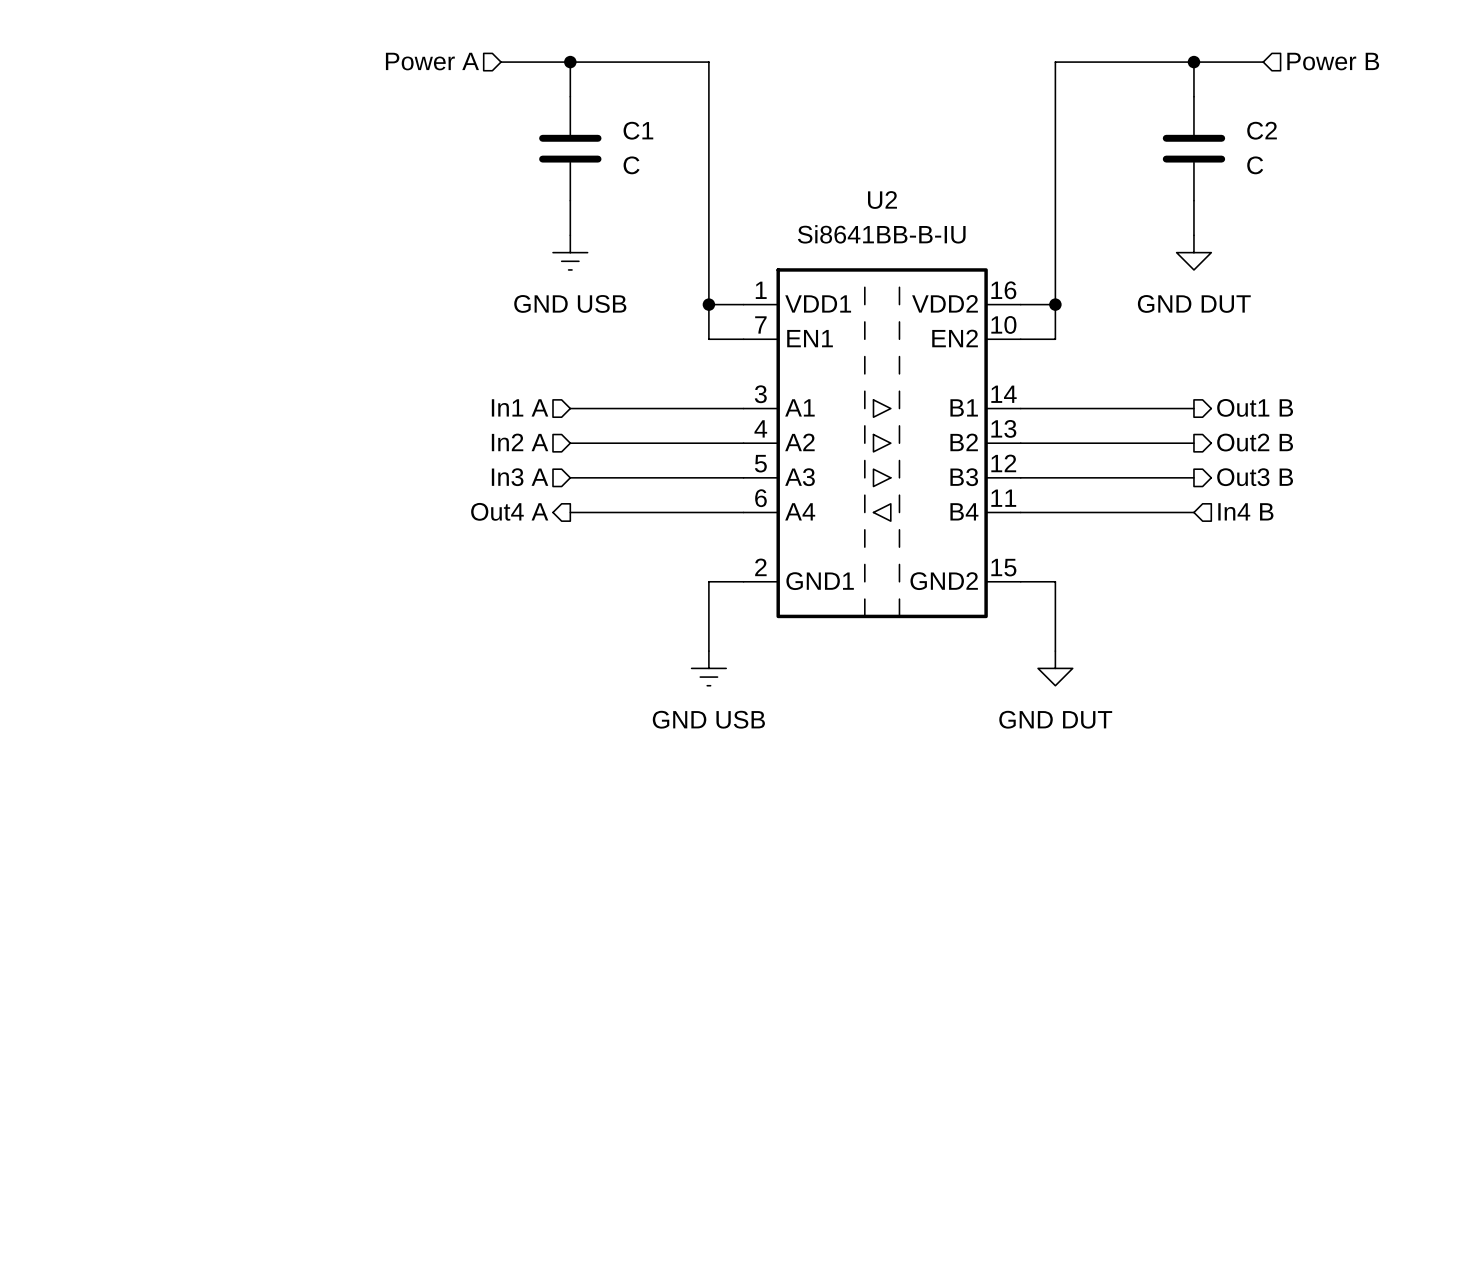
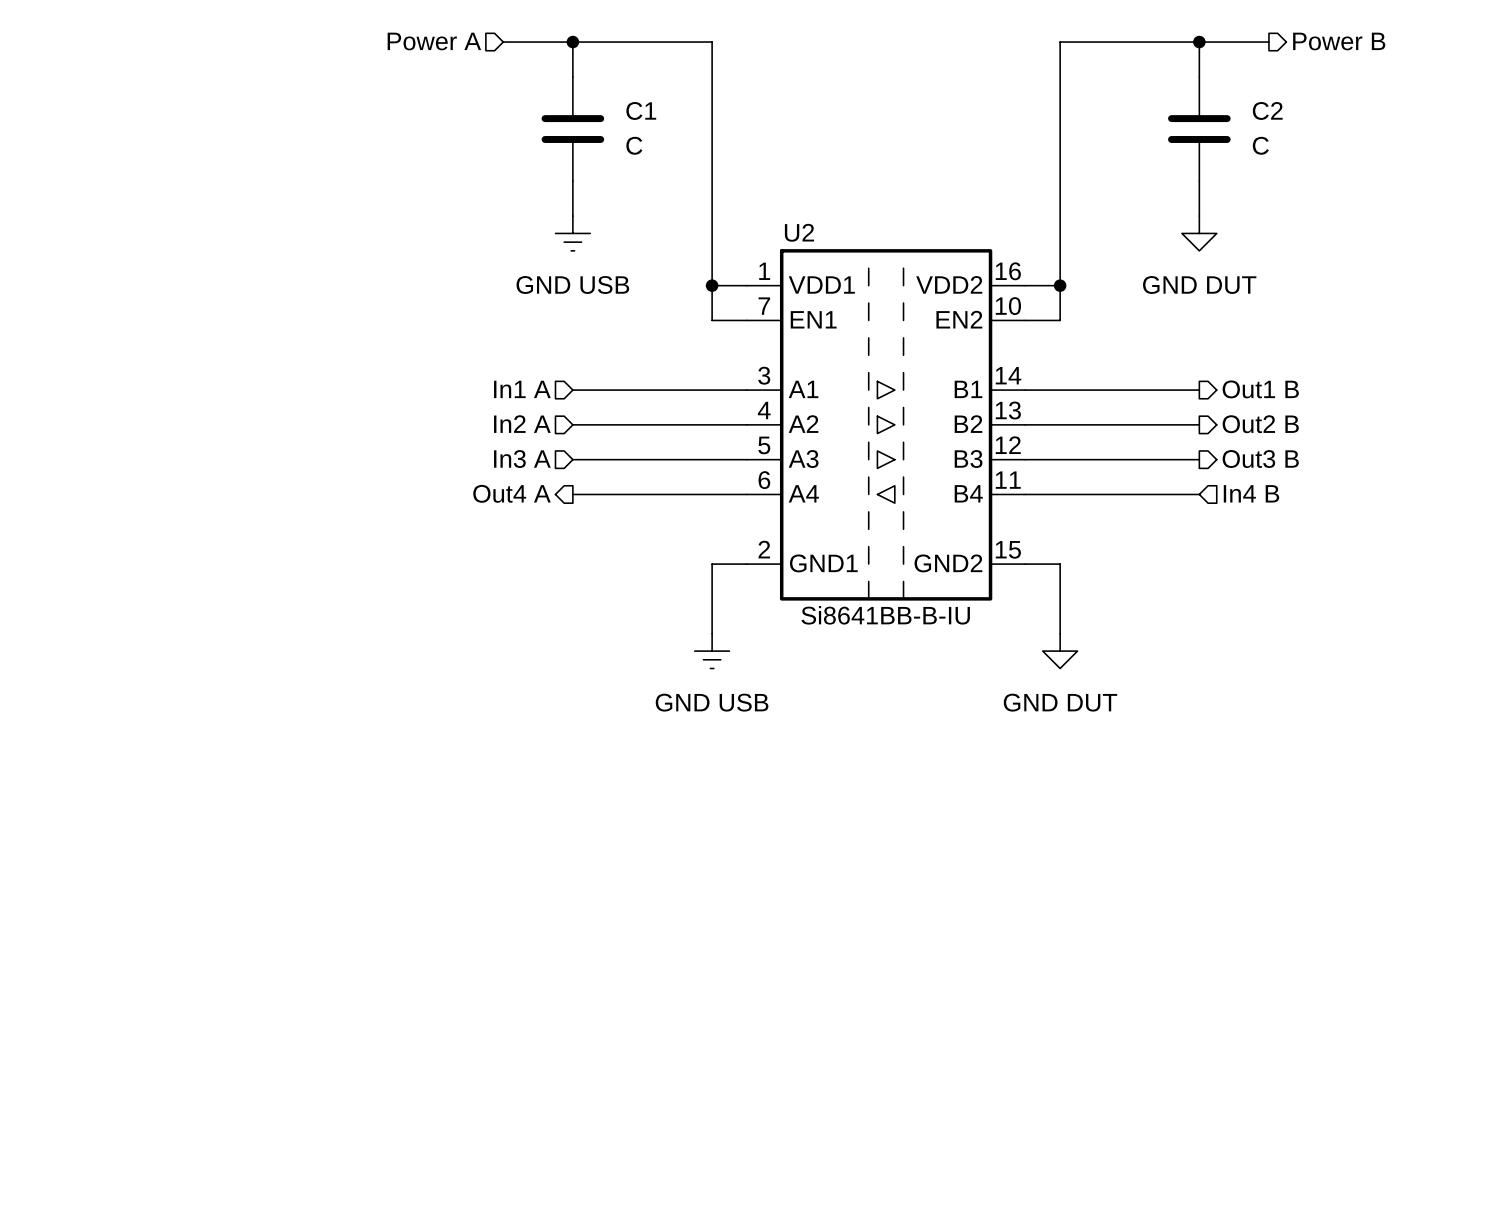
hierarchical label shape: input (1333, 61) -> output (1339, 41)
U2 name position: U2 (882, 200) -> U2 (799, 232)
U2 value position: Si8641BB-B-IU (881, 234) -> Si8641BB-B-IU (885, 615)

